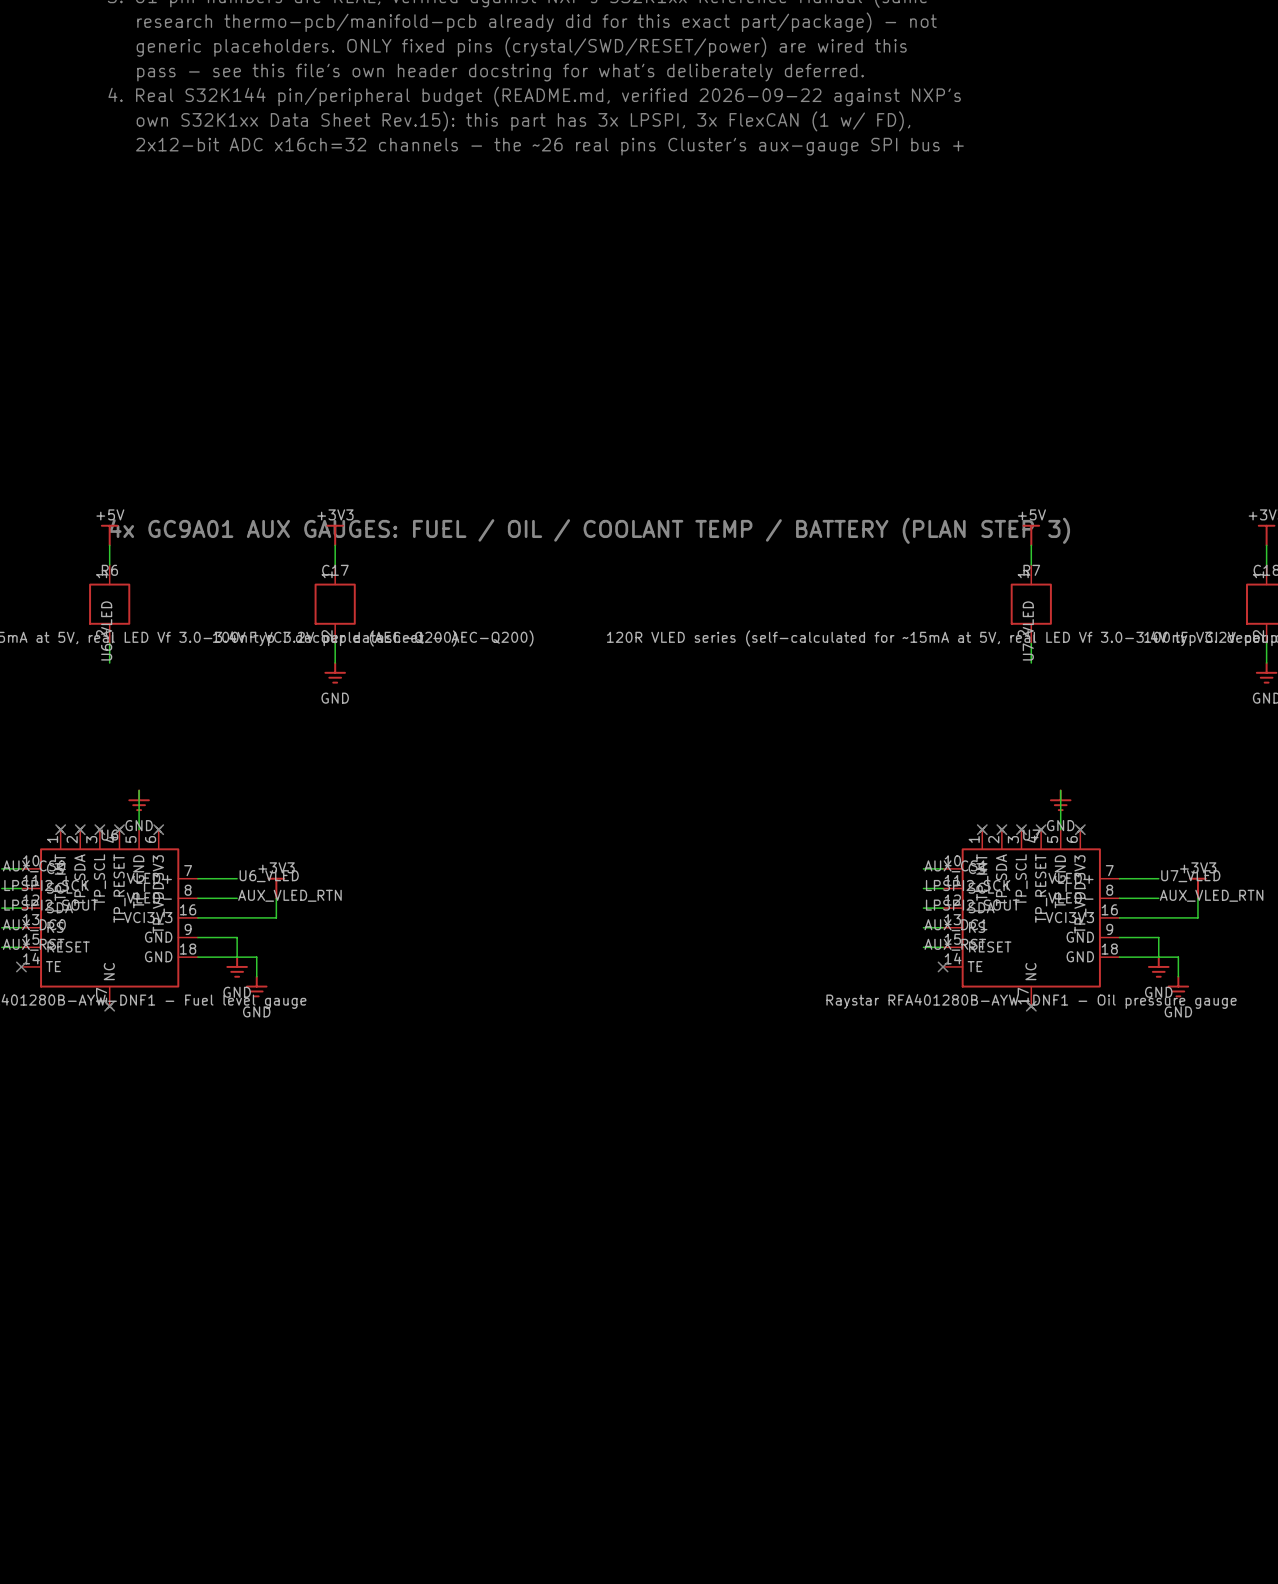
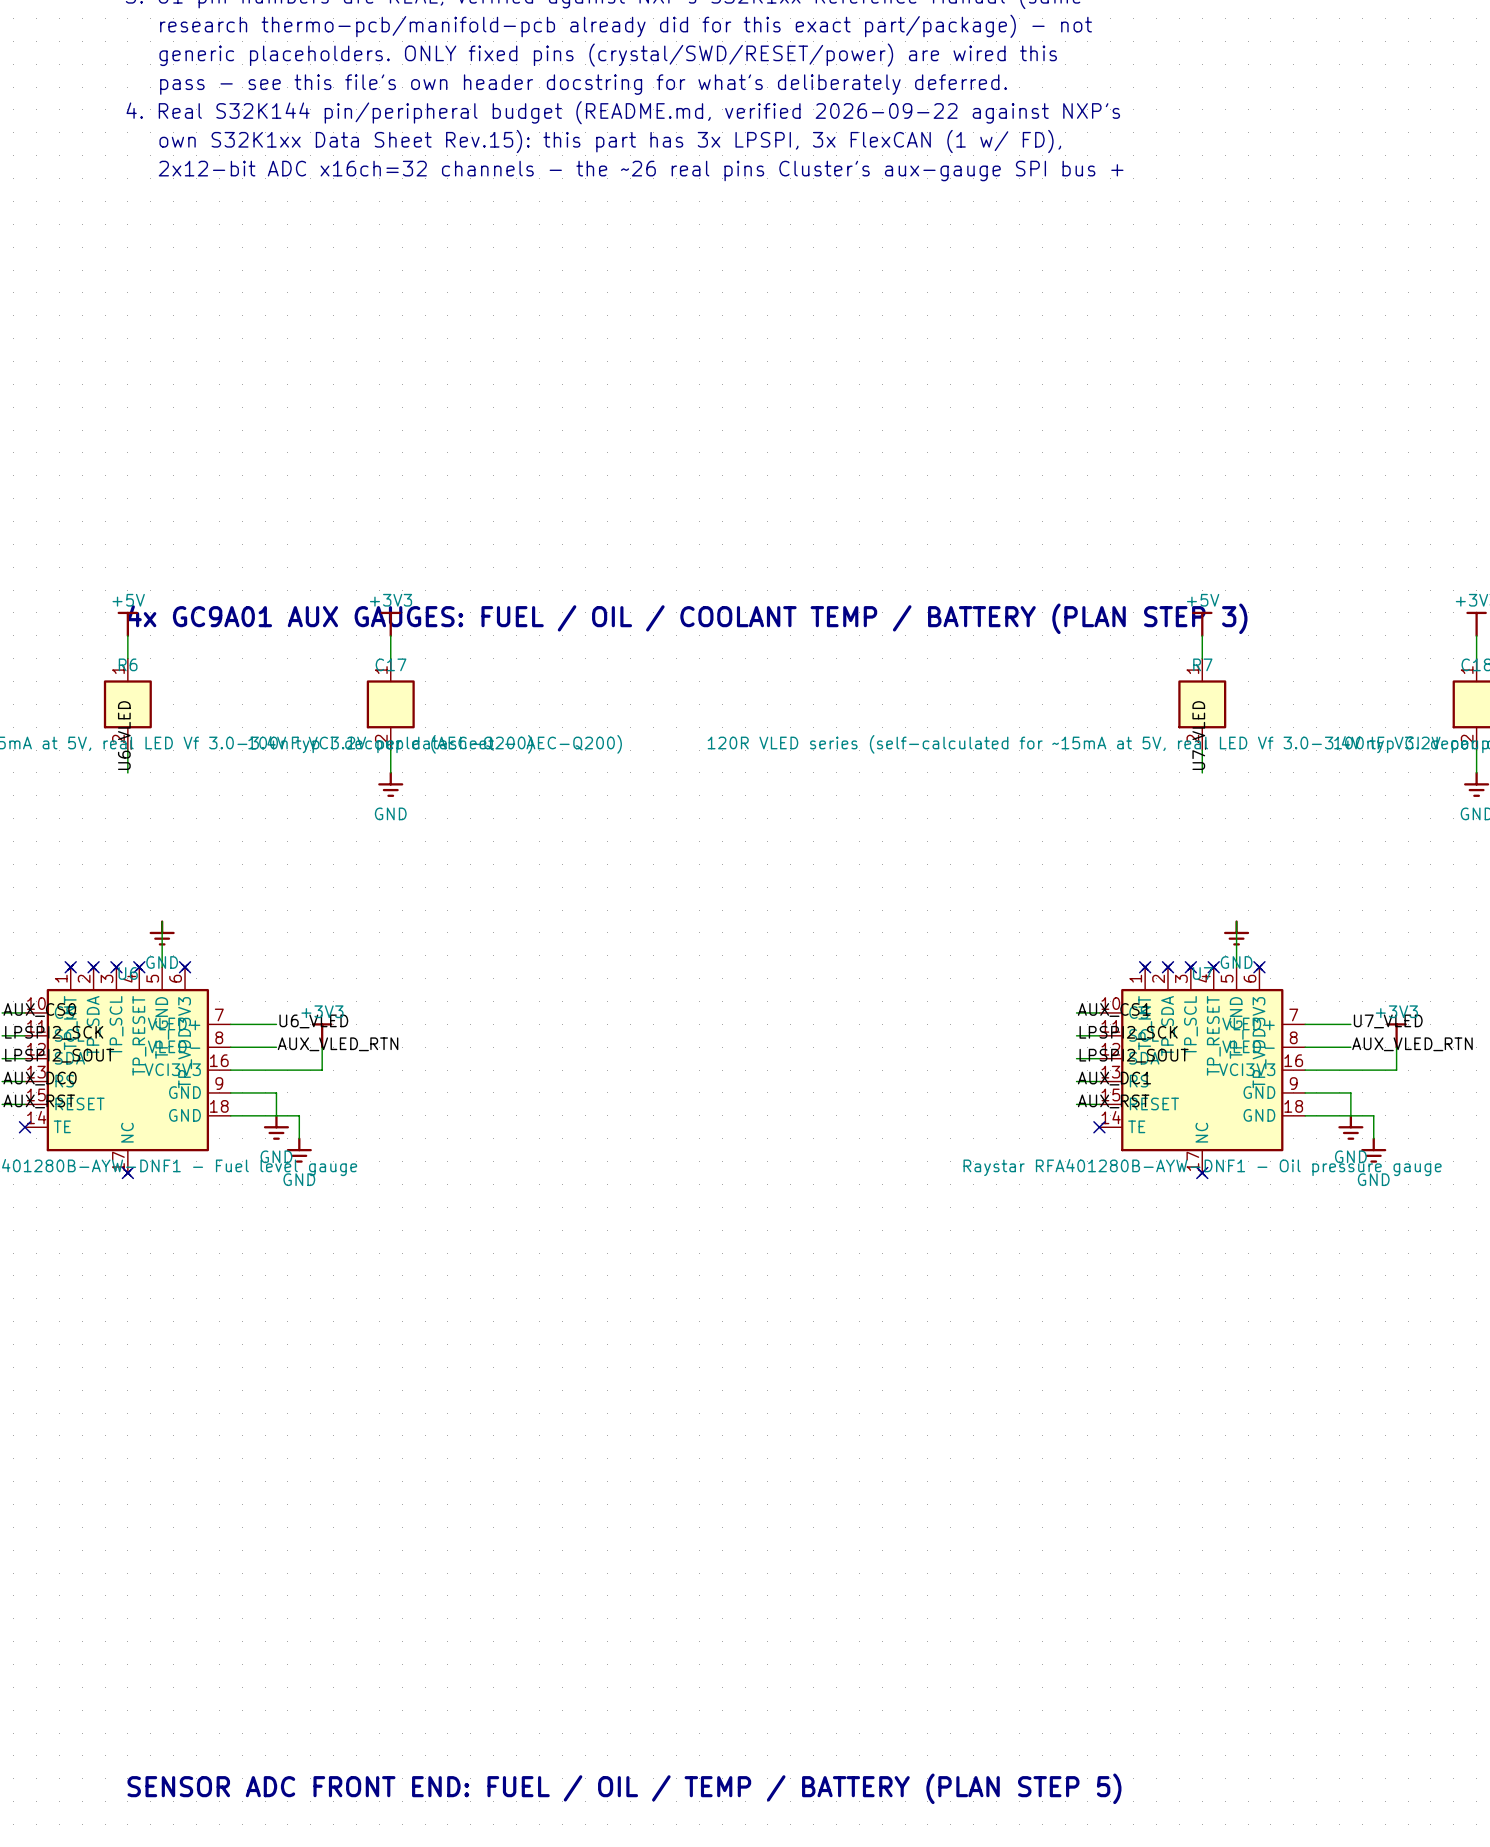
text: none -> SENSOR ADC FRONT END: FUEL / OIL / TEMP / BATTERY (PLAN STEP 5) (624, 1788)

